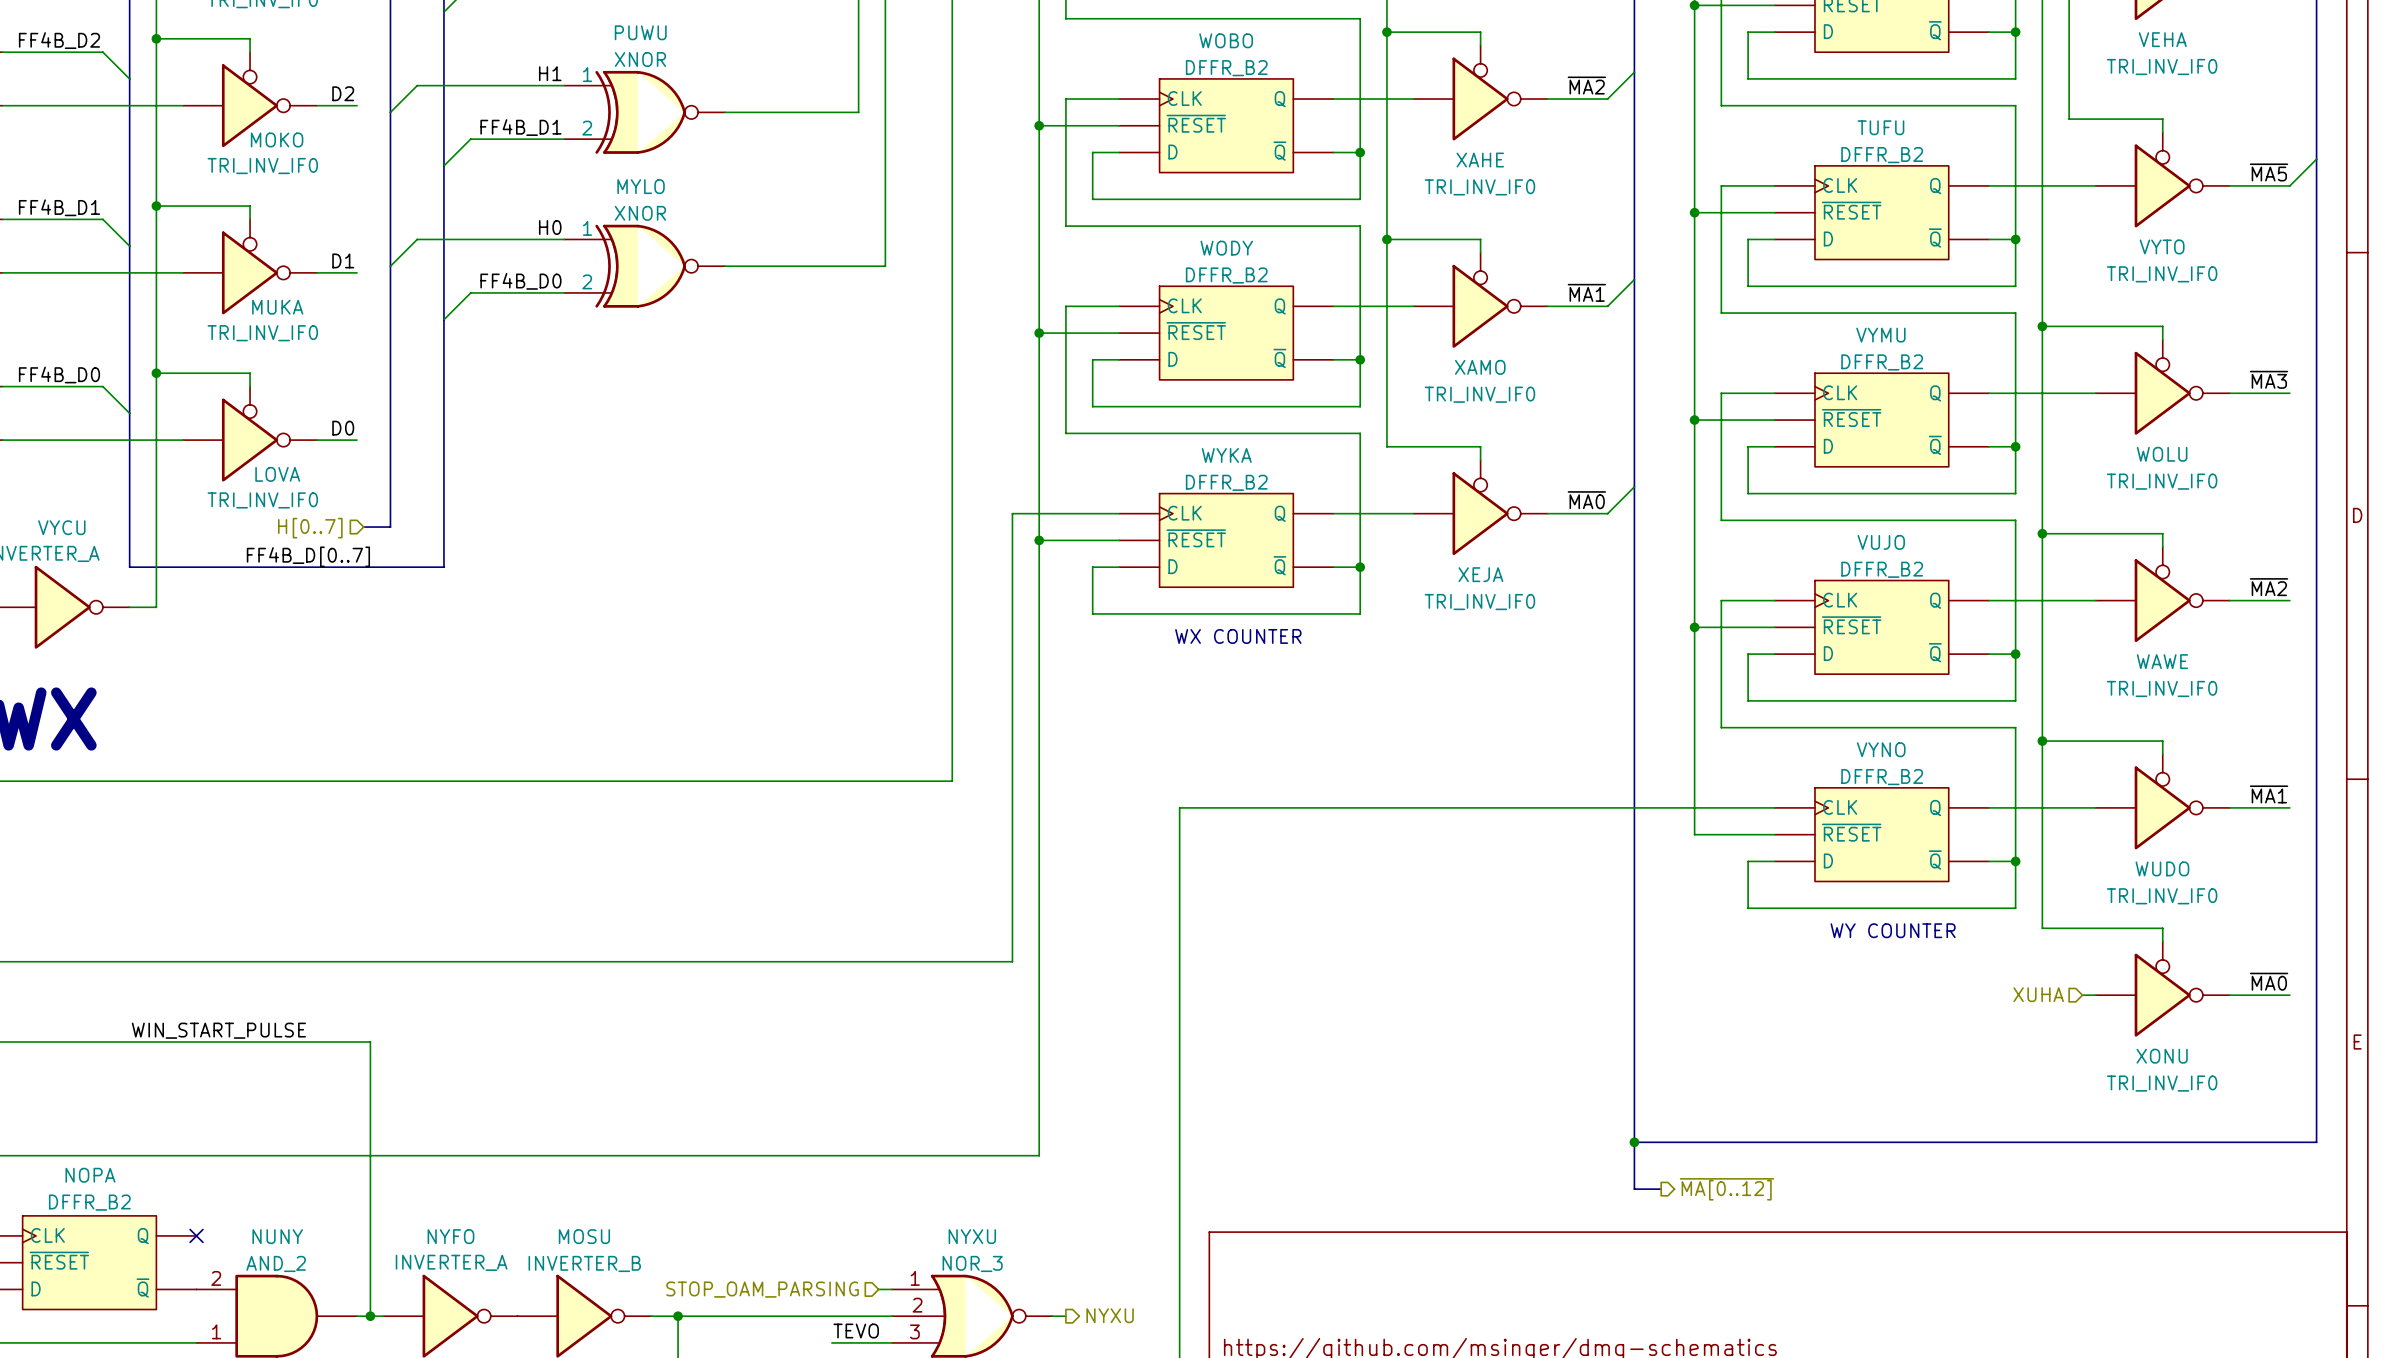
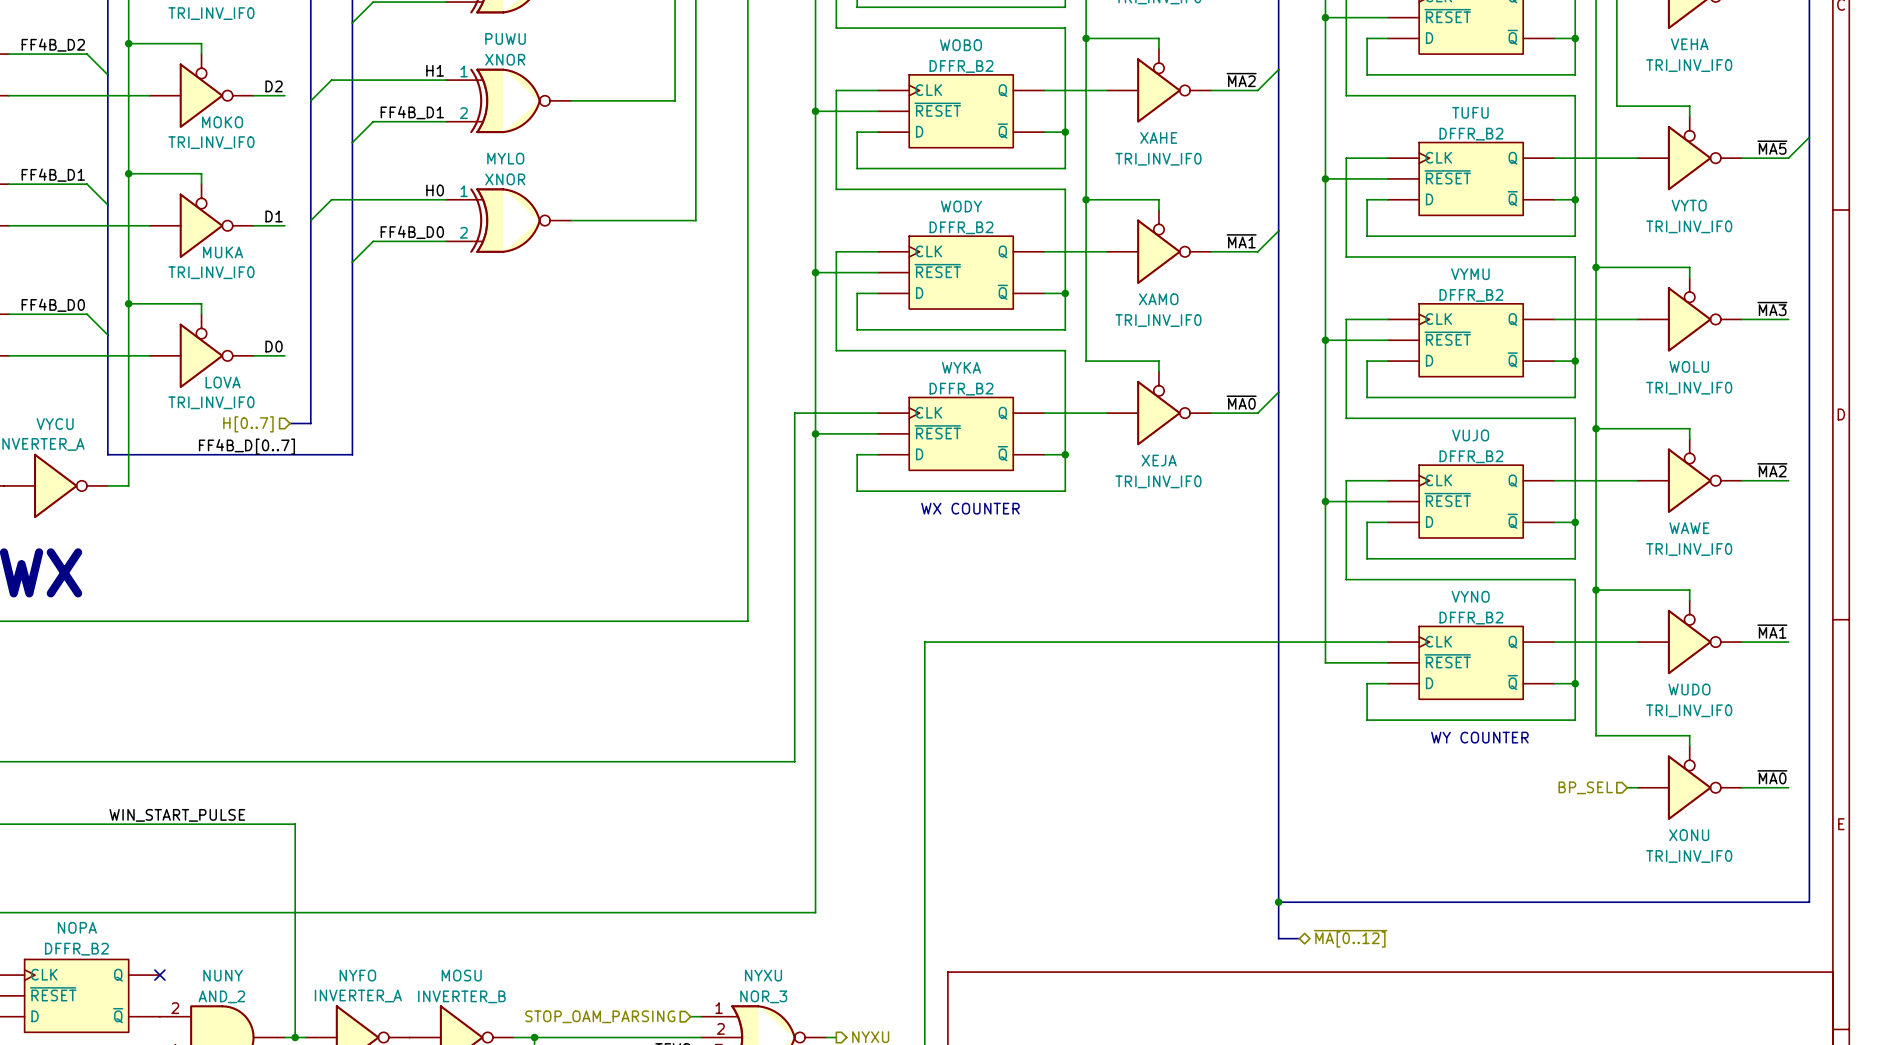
hierarchical label: XUHA (2038, 994) -> BP_SEL (1585, 787)
hierarchical label shape: output (1726, 1189) -> bidirectional (1350, 938)

